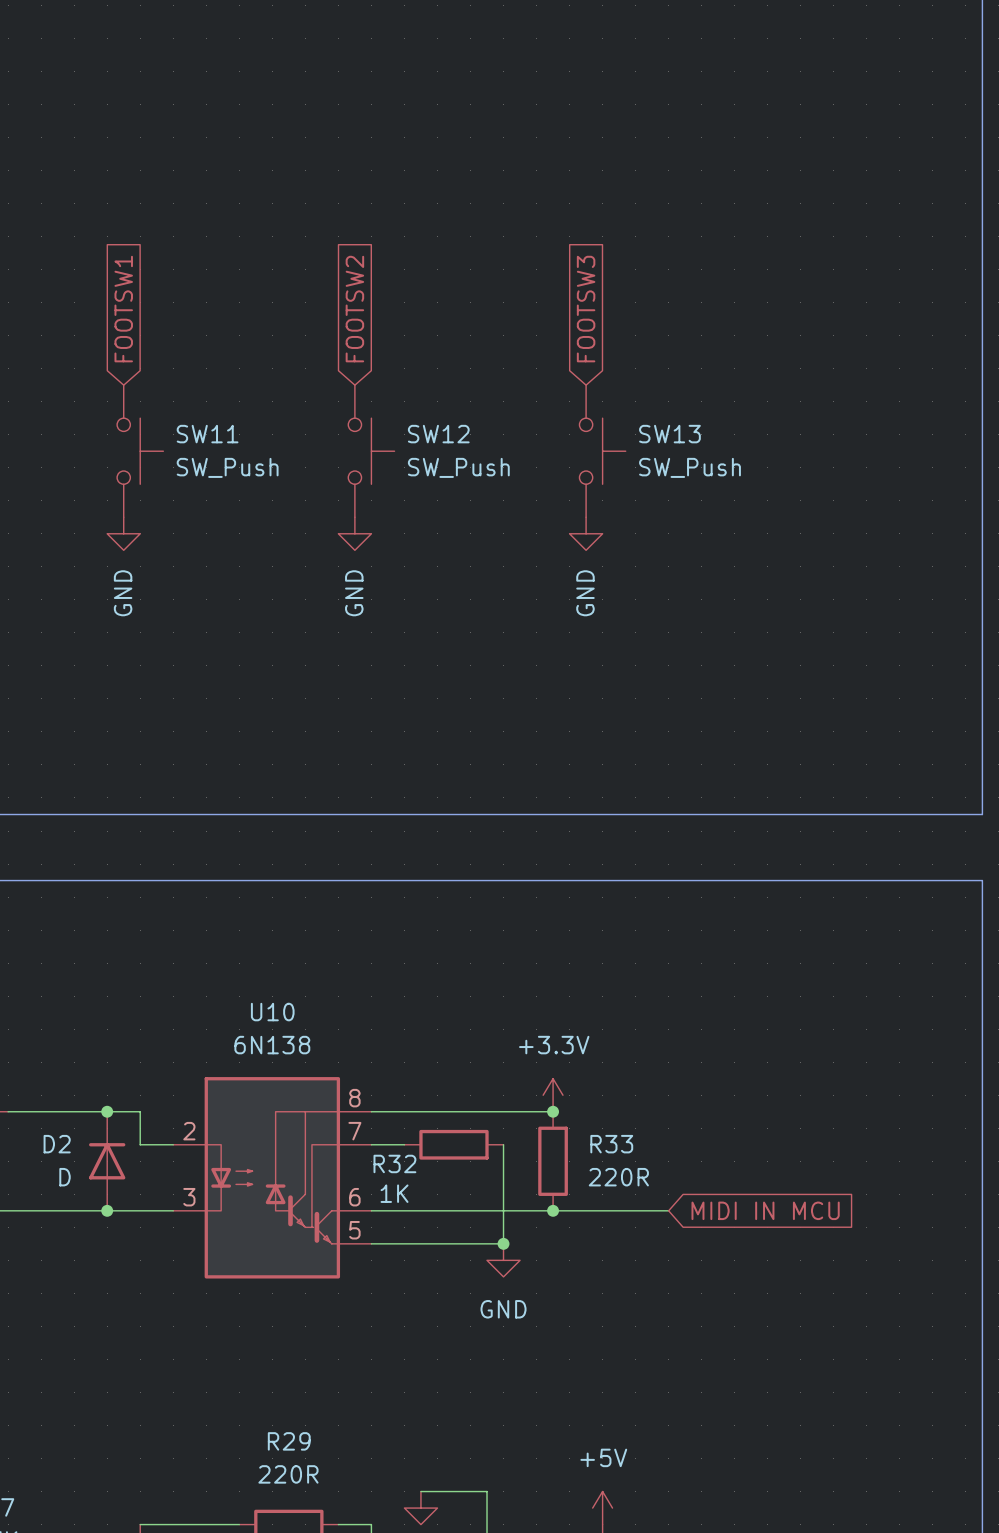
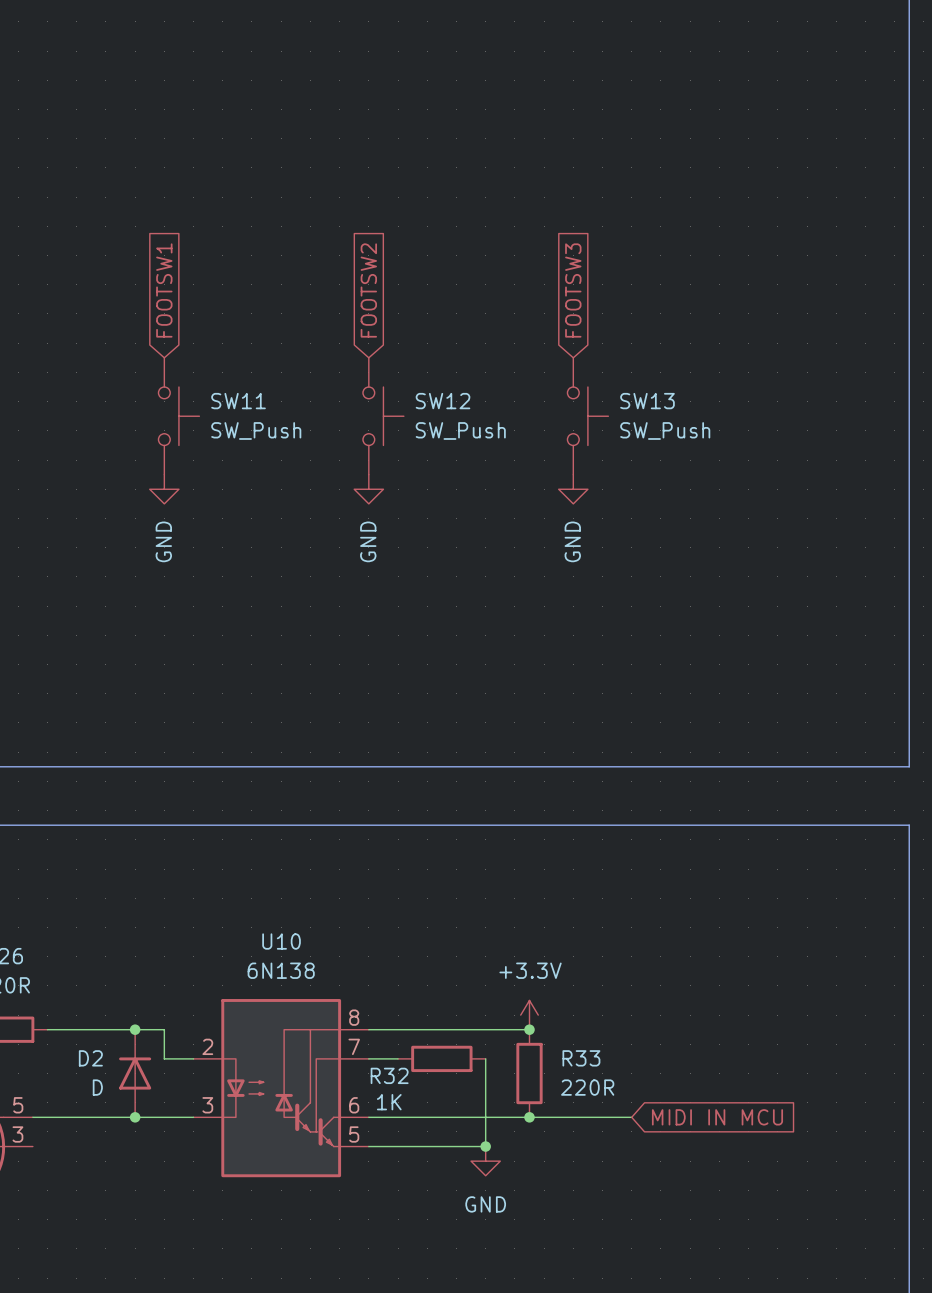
global label position: FOOTSW1 (123, 309) -> FOOTSW1 (164, 290)
global label position: FOOTSW2 (354, 309) -> FOOTSW2 (368, 290)
global label position: FOOTSW3 (586, 309) -> FOOTSW3 (573, 290)
SW11 position: (140, 451) -> (178, 416)
SW12 position: (371, 451) -> (383, 416)
SW13 position: (602, 451) -> (587, 416)
power symbol position: GND (123, 533) -> GND (164, 489)
power symbol position: GND (354, 533) -> GND (368, 489)
power symbol position: GND (586, 533) -> GND (573, 489)

